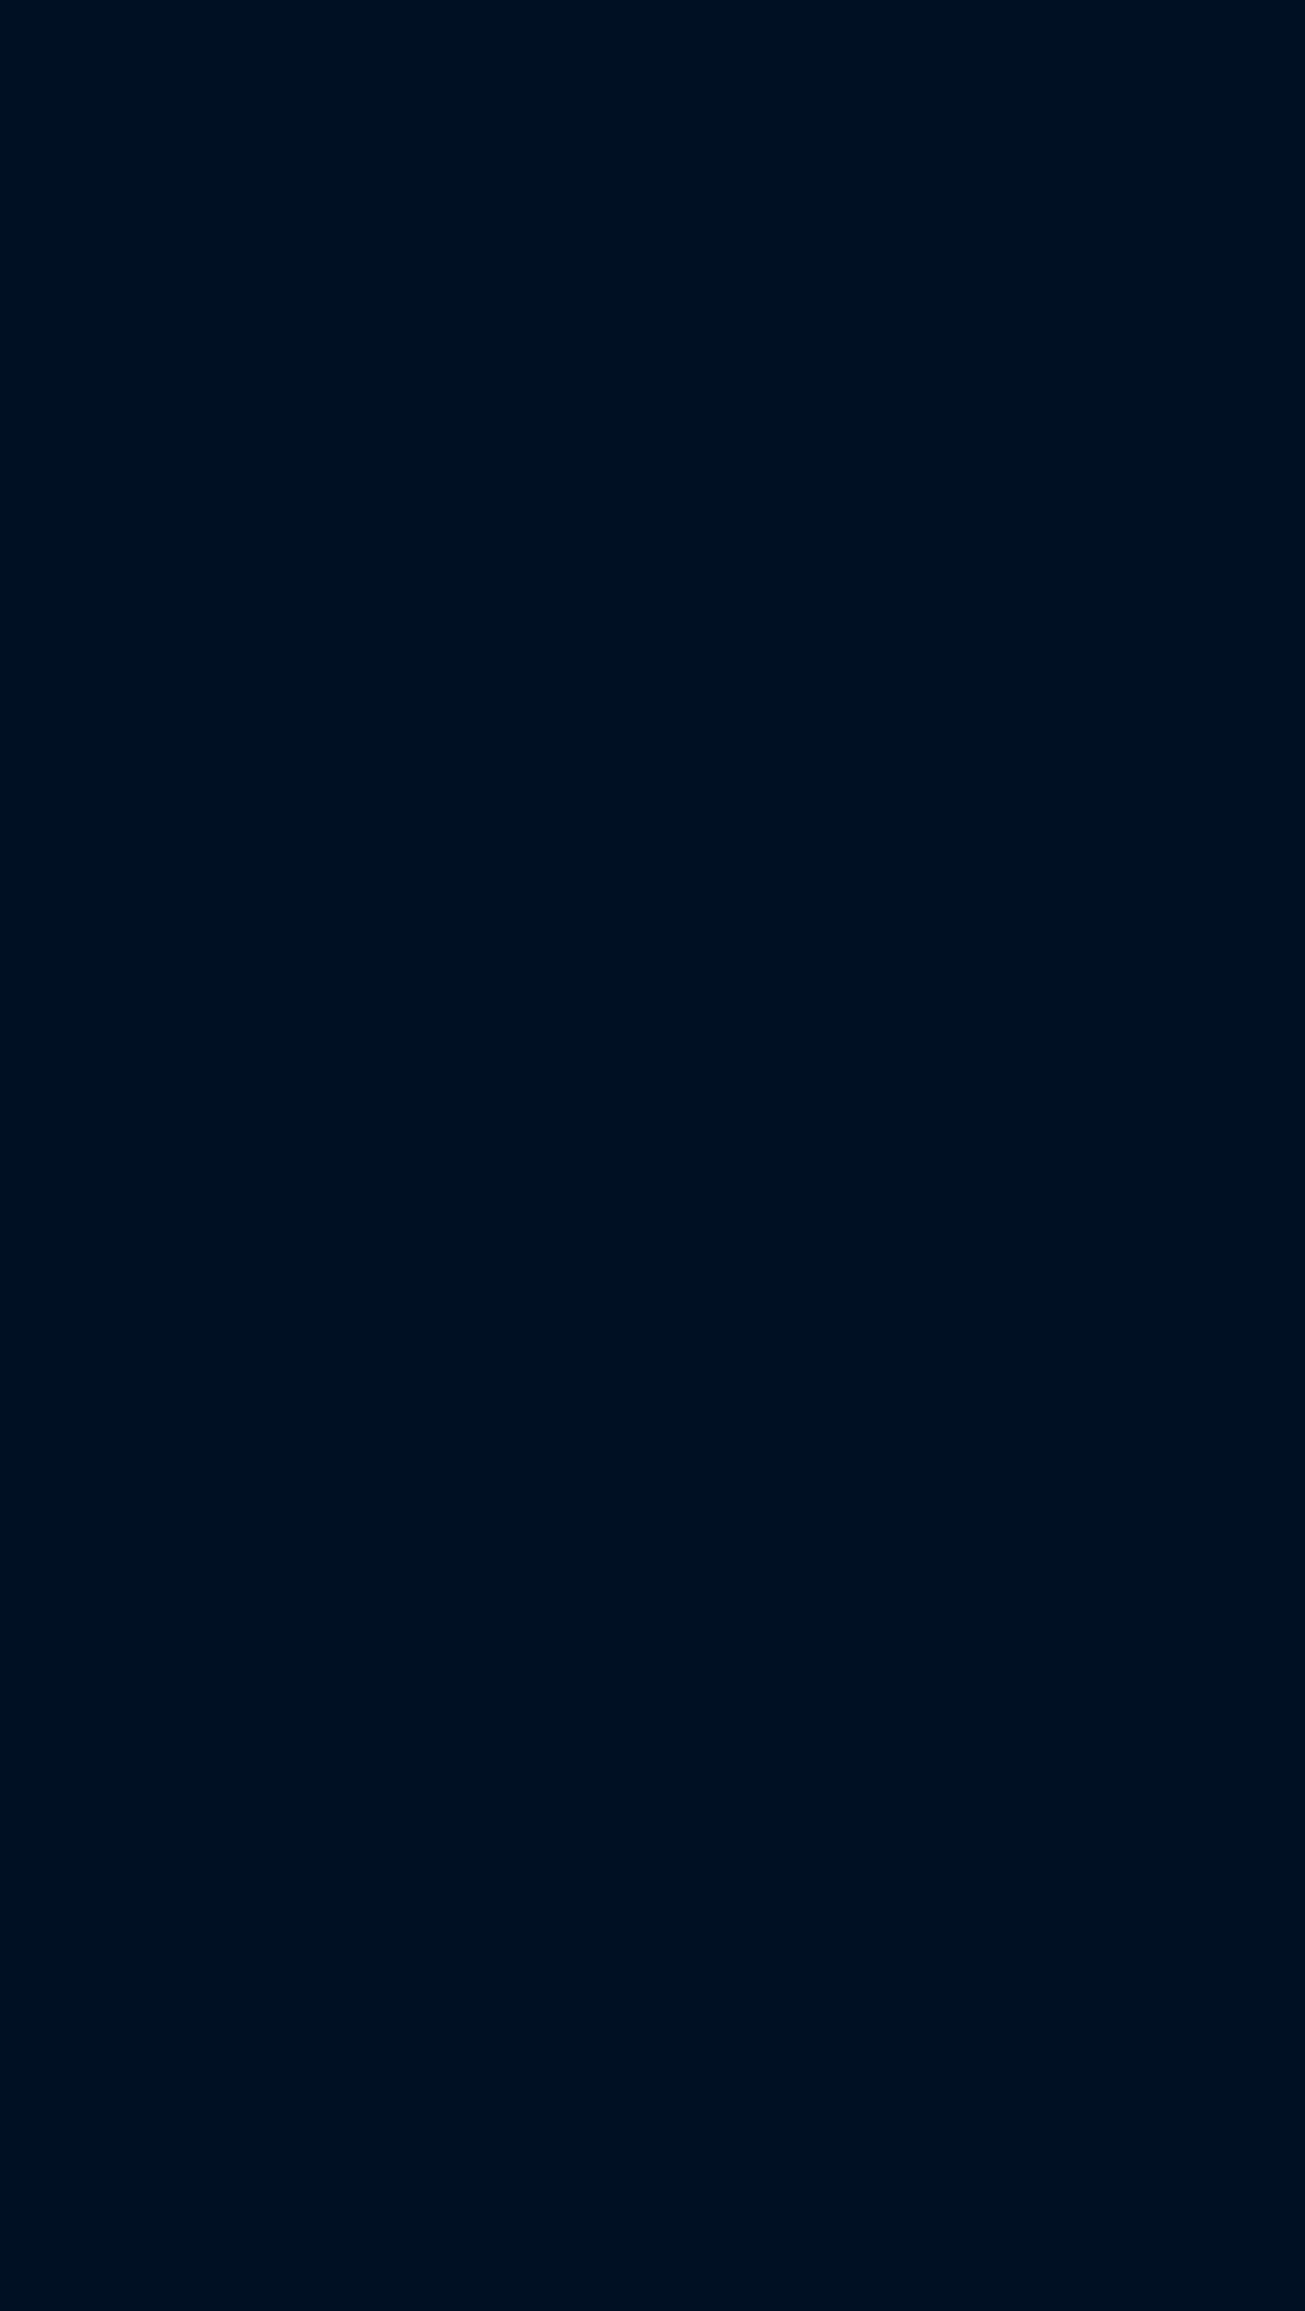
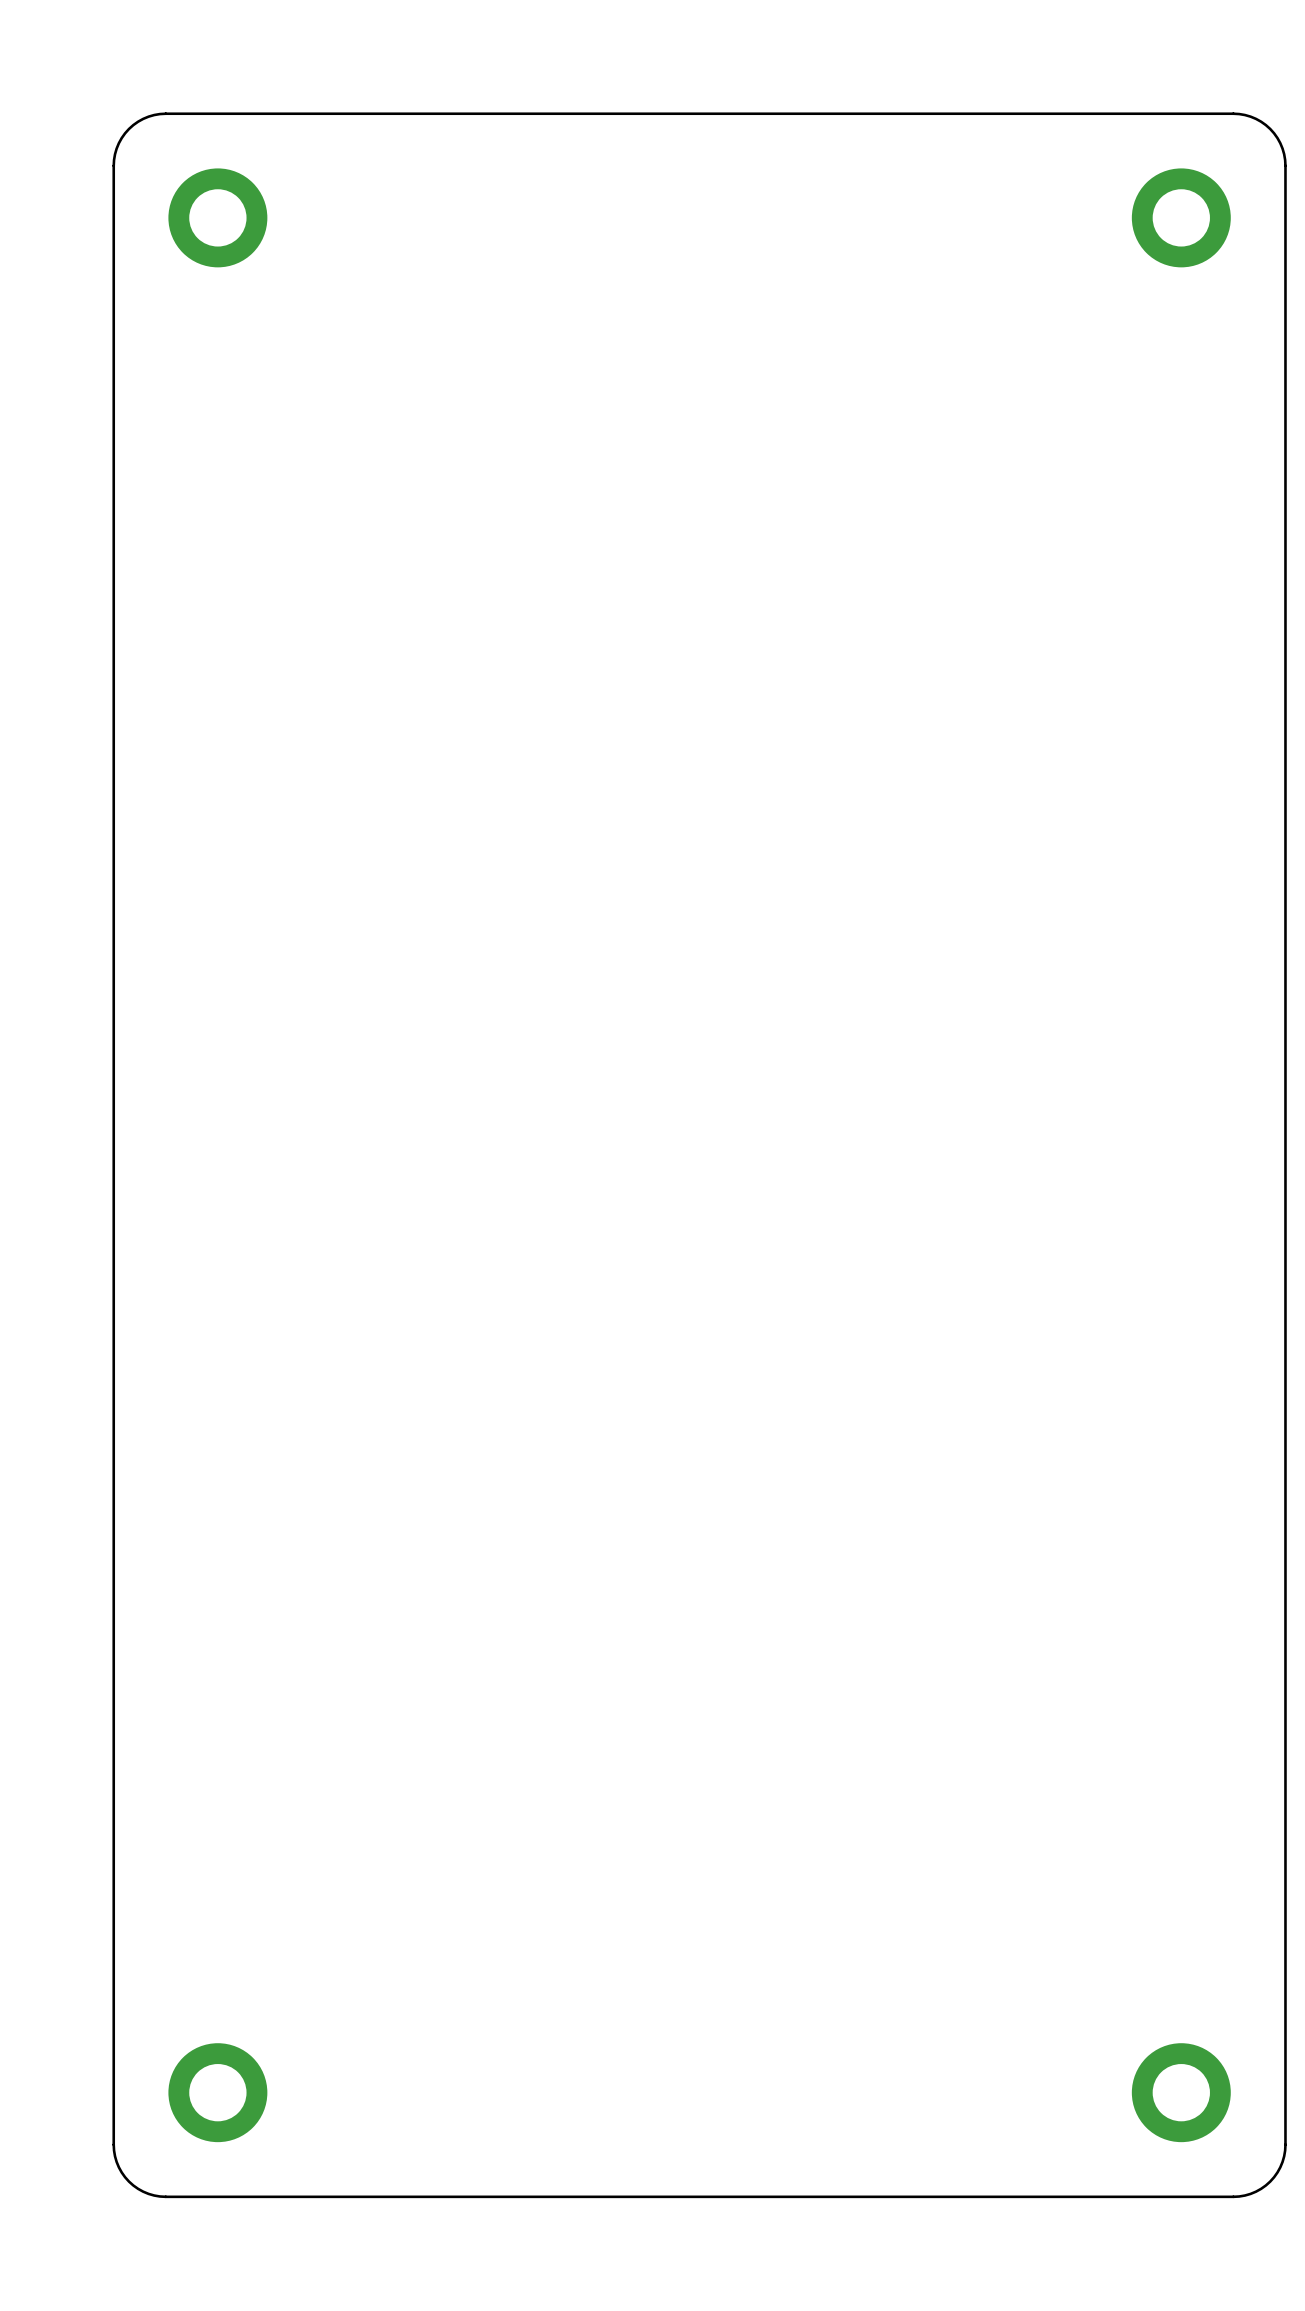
board edge: none -> (1233, 113) (165, 113) (154, 115) (138, 121) (125, 133) (118, 143) (113, 165) (113, 2144) (116, 2161) (121, 2172) (128, 2181) (143, 2191) (165, 2196) (1233, 2196) (1244, 2195) (1261, 2188) (1270, 2181) (1280, 2167) (1285, 2144) (1285, 165) (1282, 148) (1270, 128) (1250, 116) (1233, 113)
part: none -> (217, 217)
part: none -> (1181, 217)
part: none -> (217, 2092)
part: none -> (1181, 2092)

